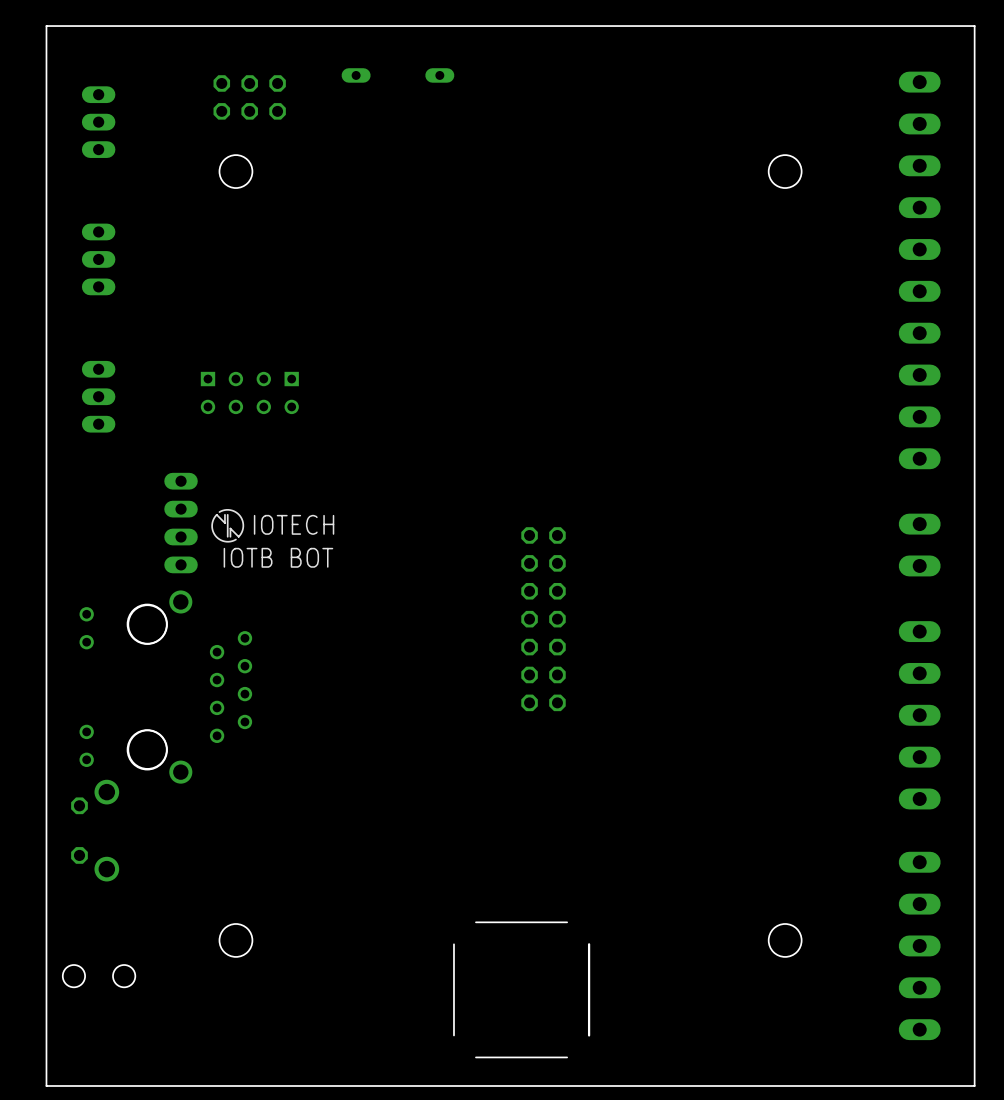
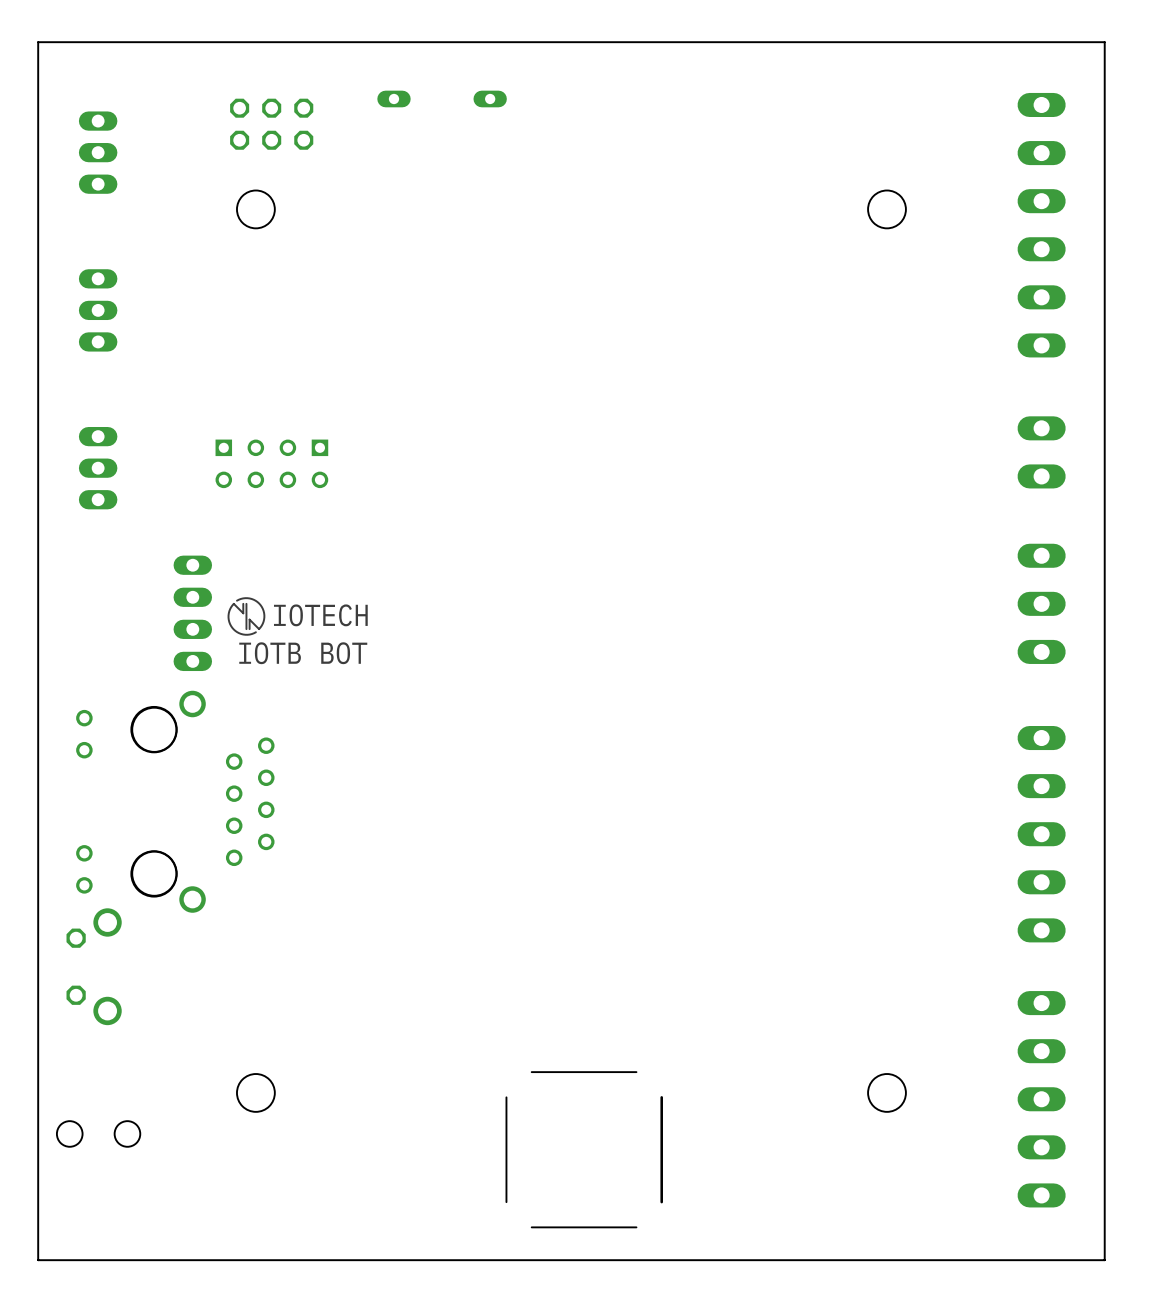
part: none -> (1041, 225)
part: (919, 270) -> none
part: none -> (1041, 603)
part position: (919, 545) -> (1041, 452)
part: (543, 619) -> none

